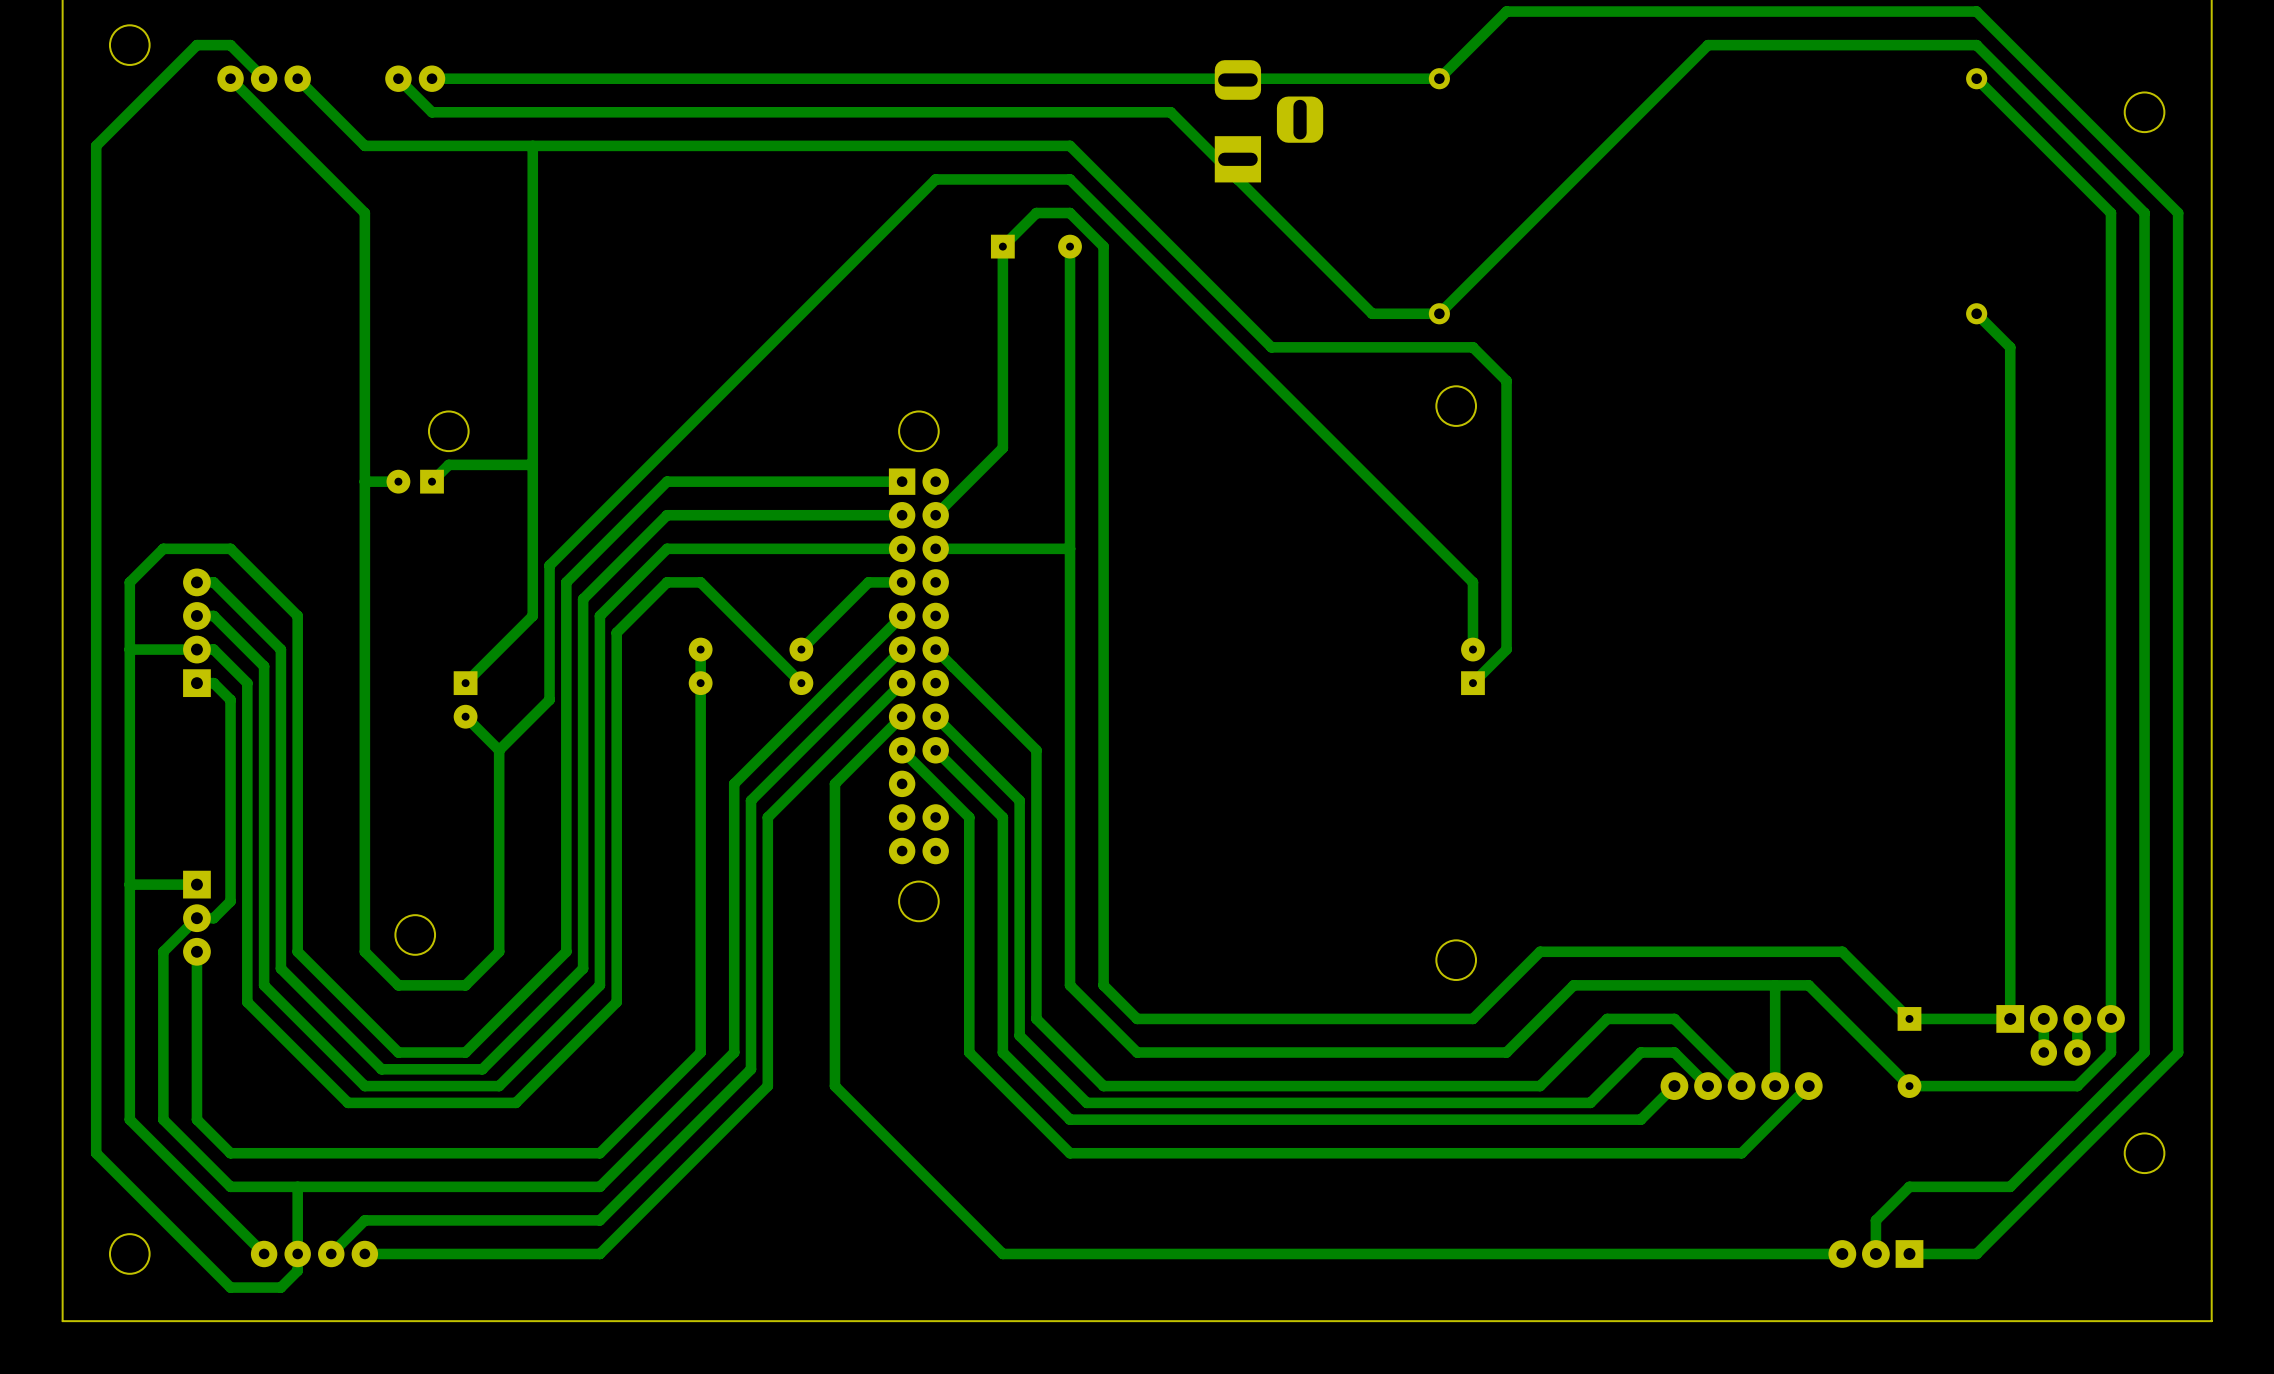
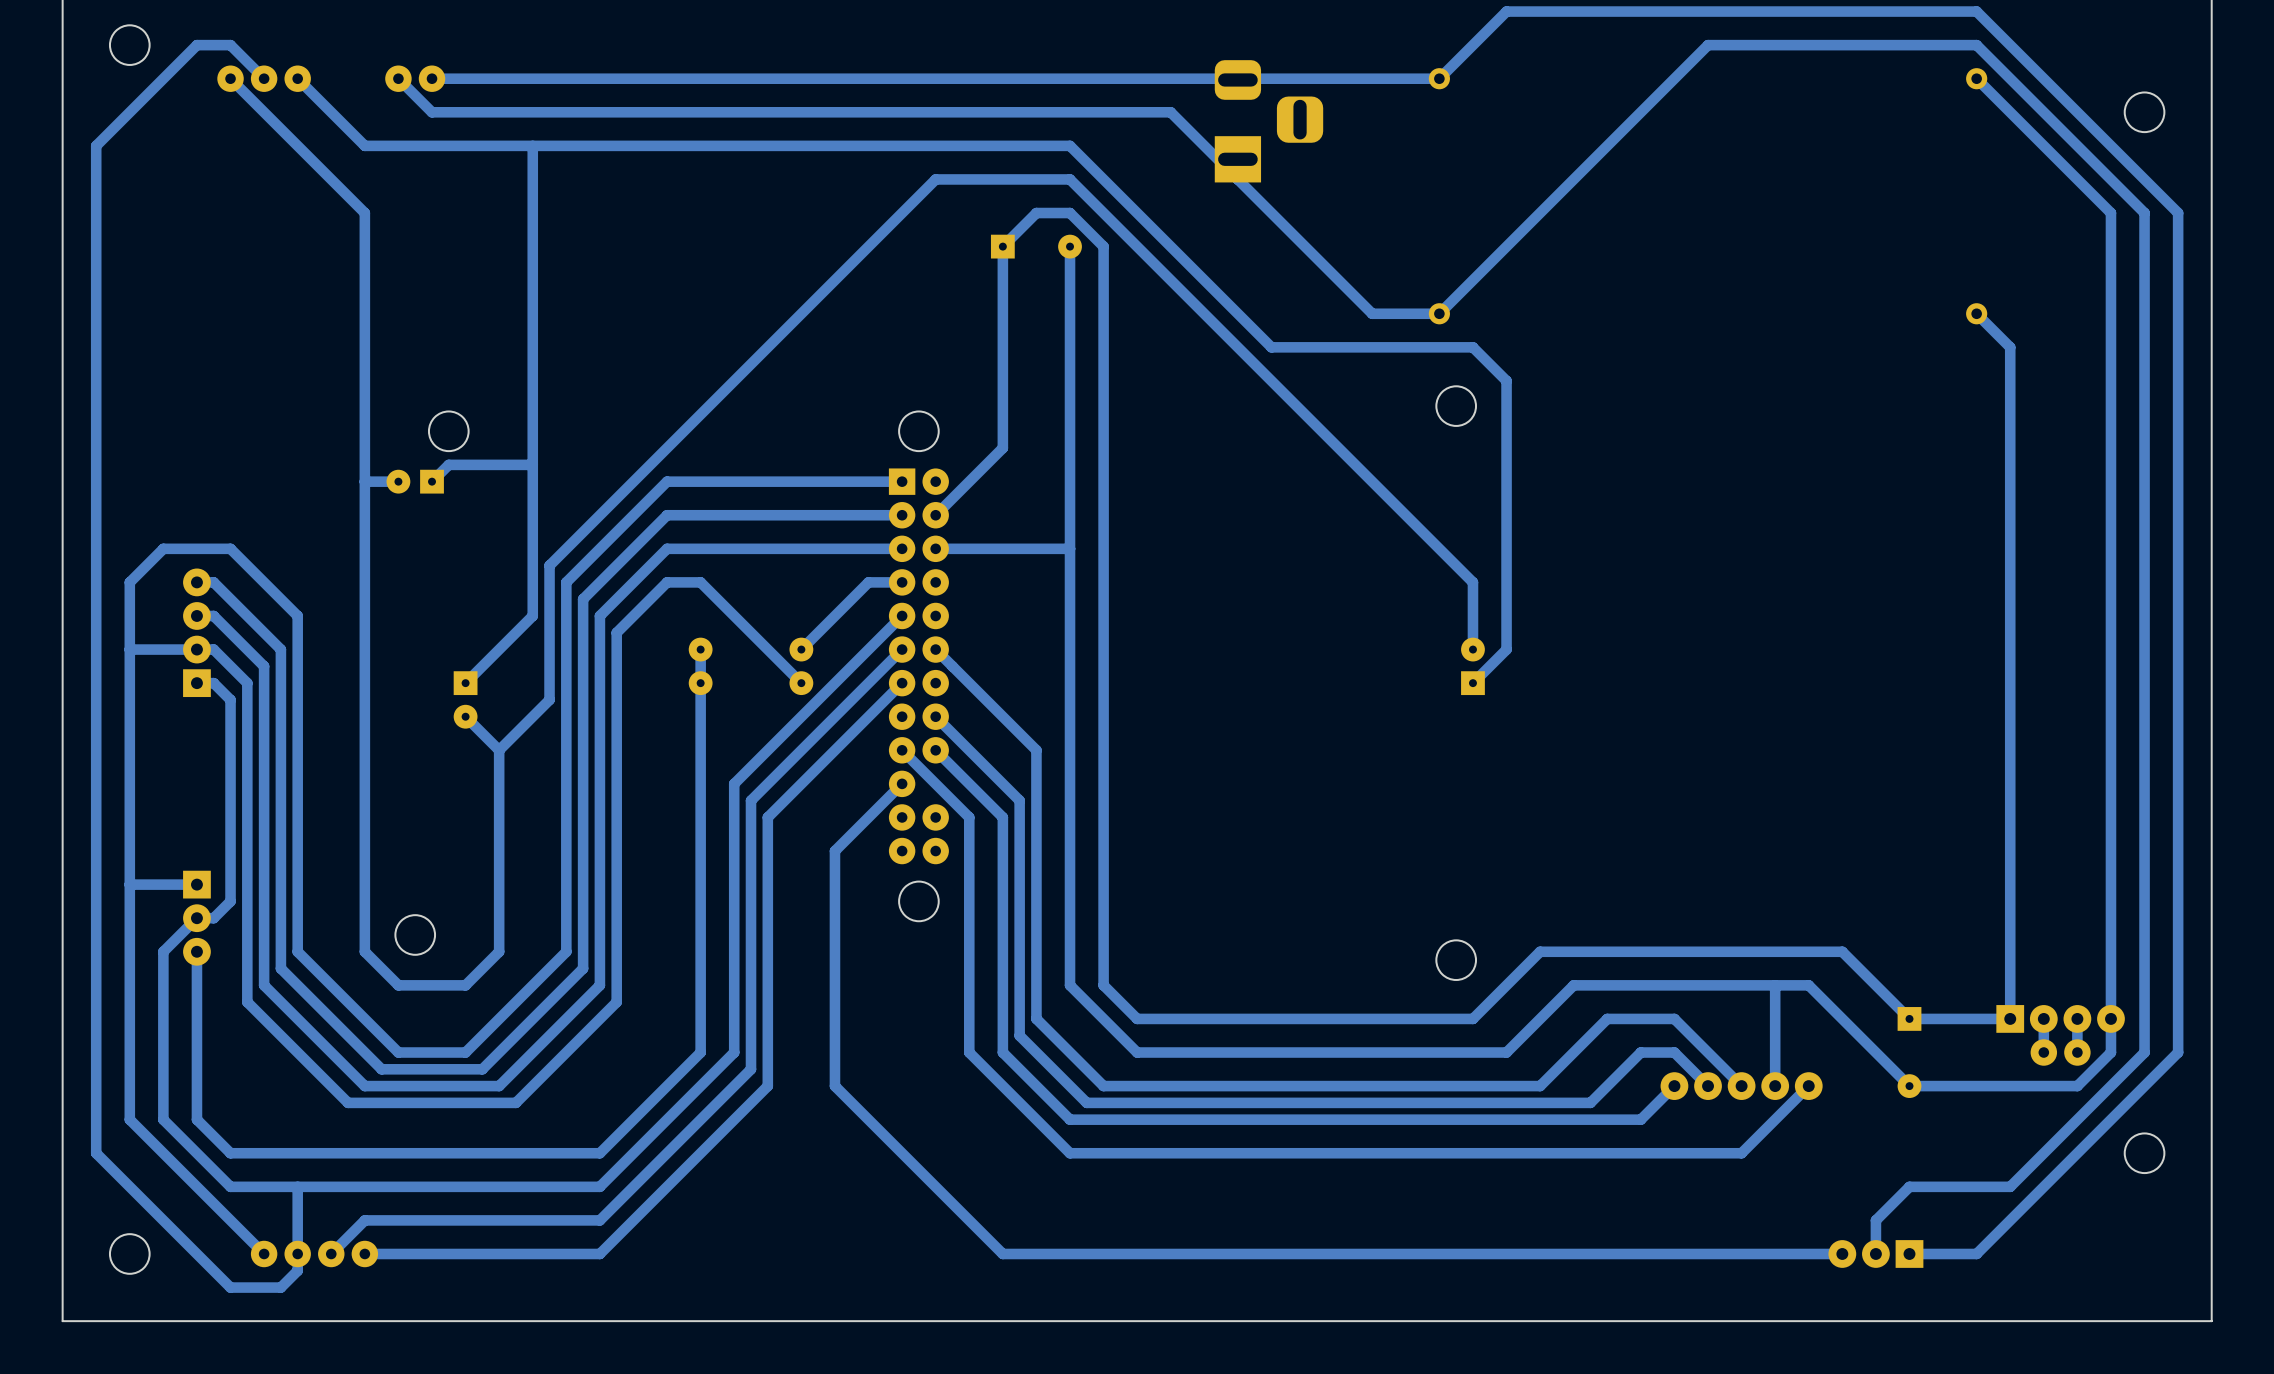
bottom track: (902, 716) (834, 783) (834, 851) -> (902, 783) (834, 851)

